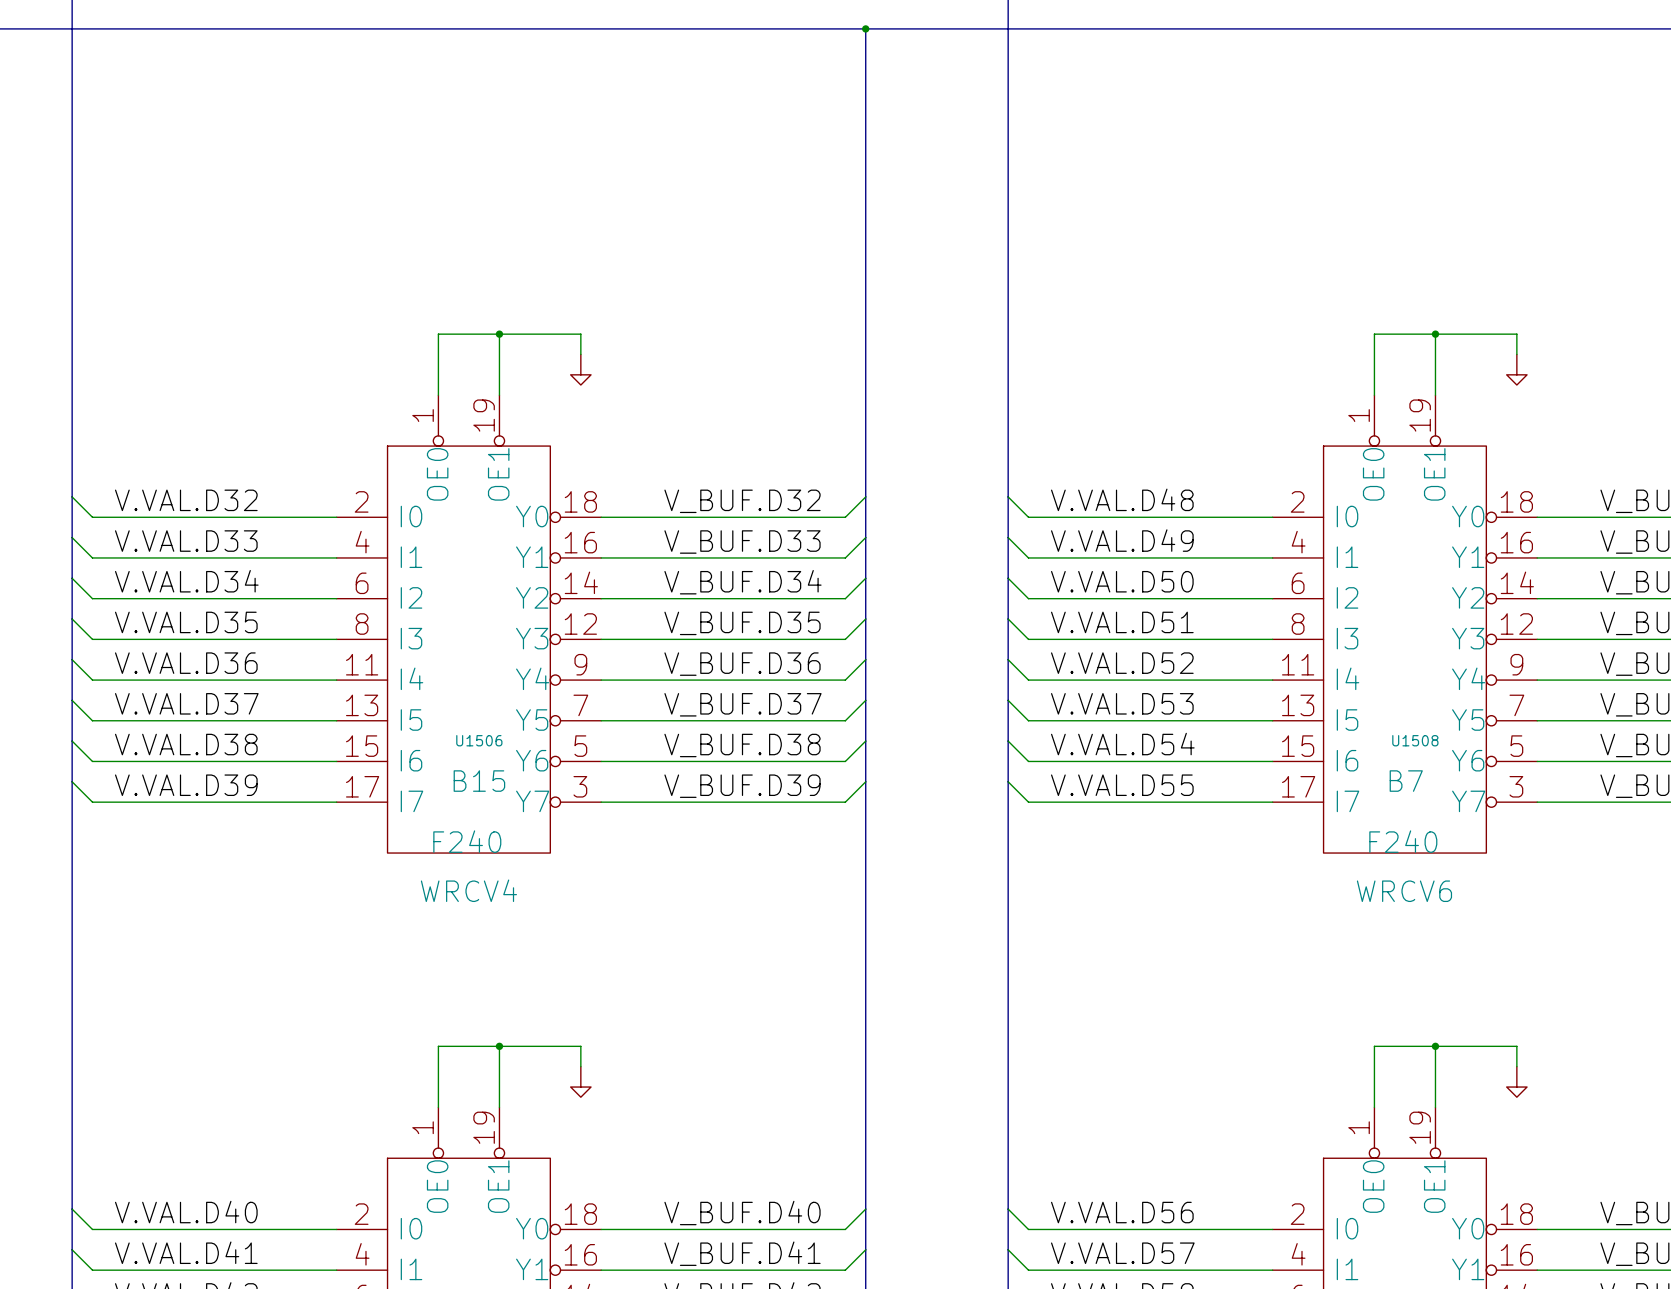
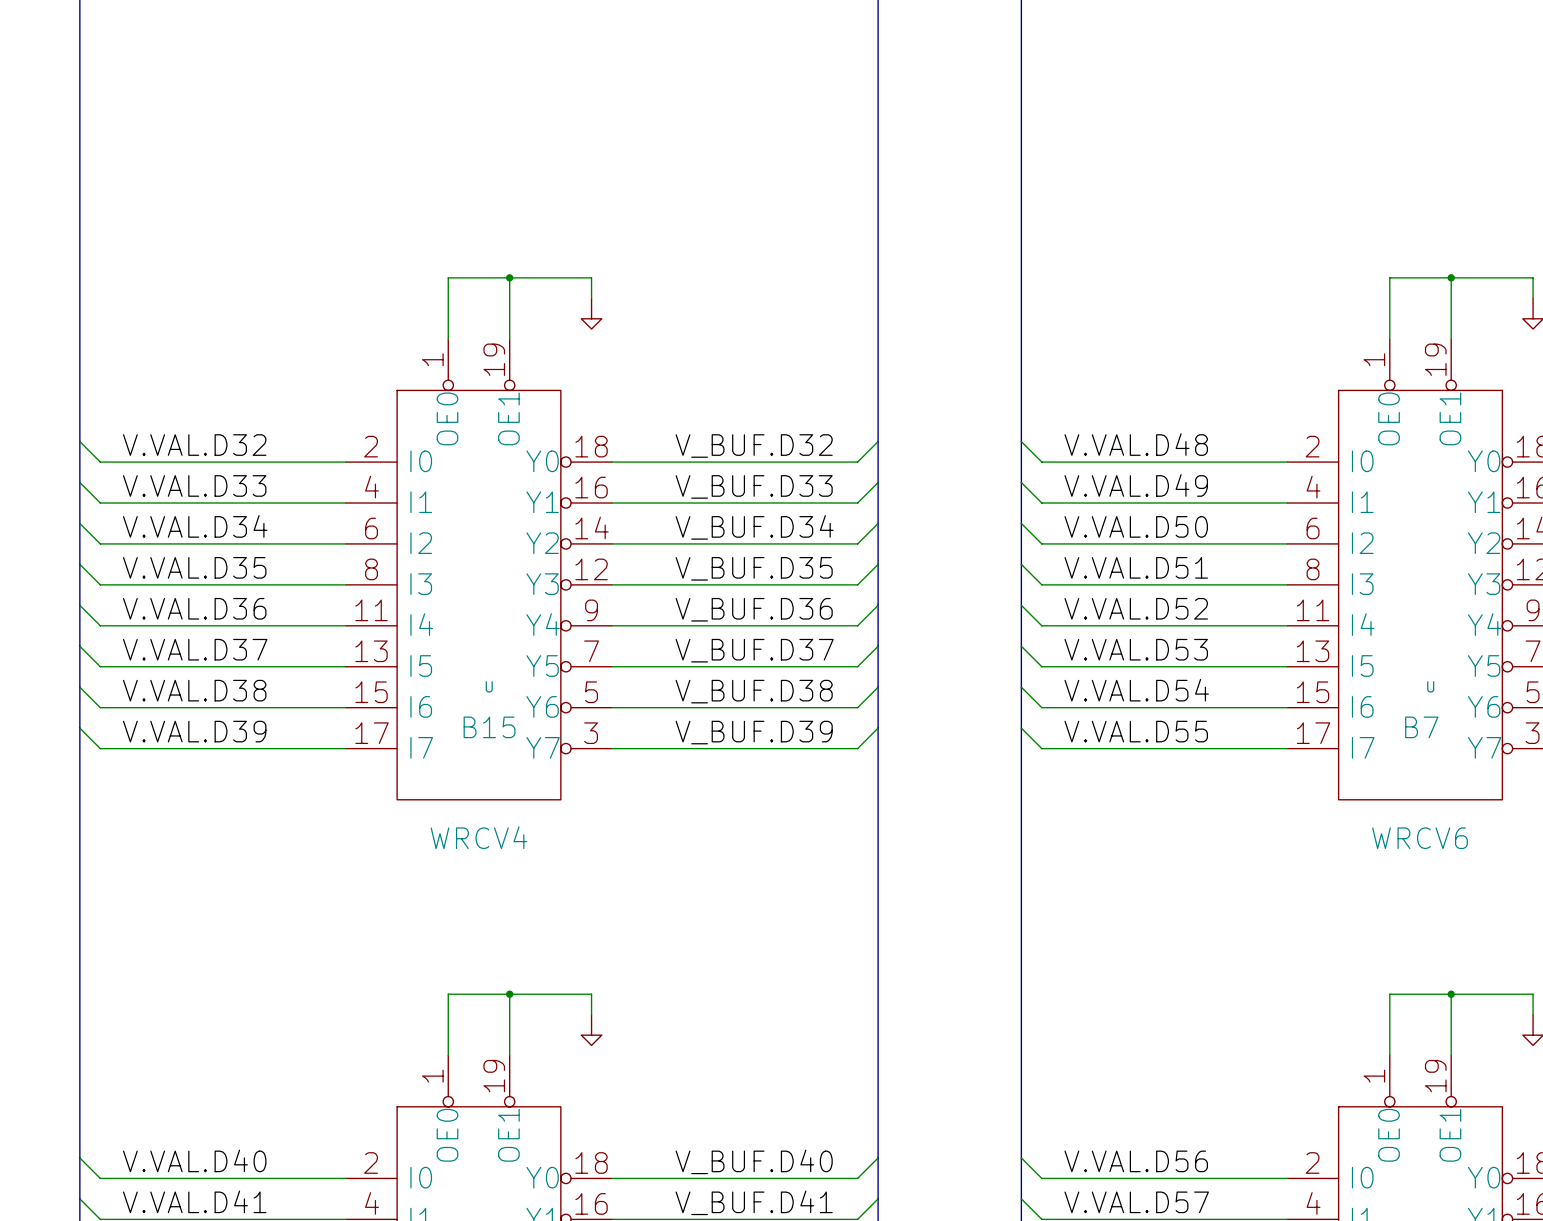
U1506 name: U1506 (479, 740) -> U (489, 686)
U1508 name: U1508 (1415, 740) -> U (1430, 686)
U1506 value: F240 (467, 841) -> none
U1508 value: F240 (1403, 841) -> none

